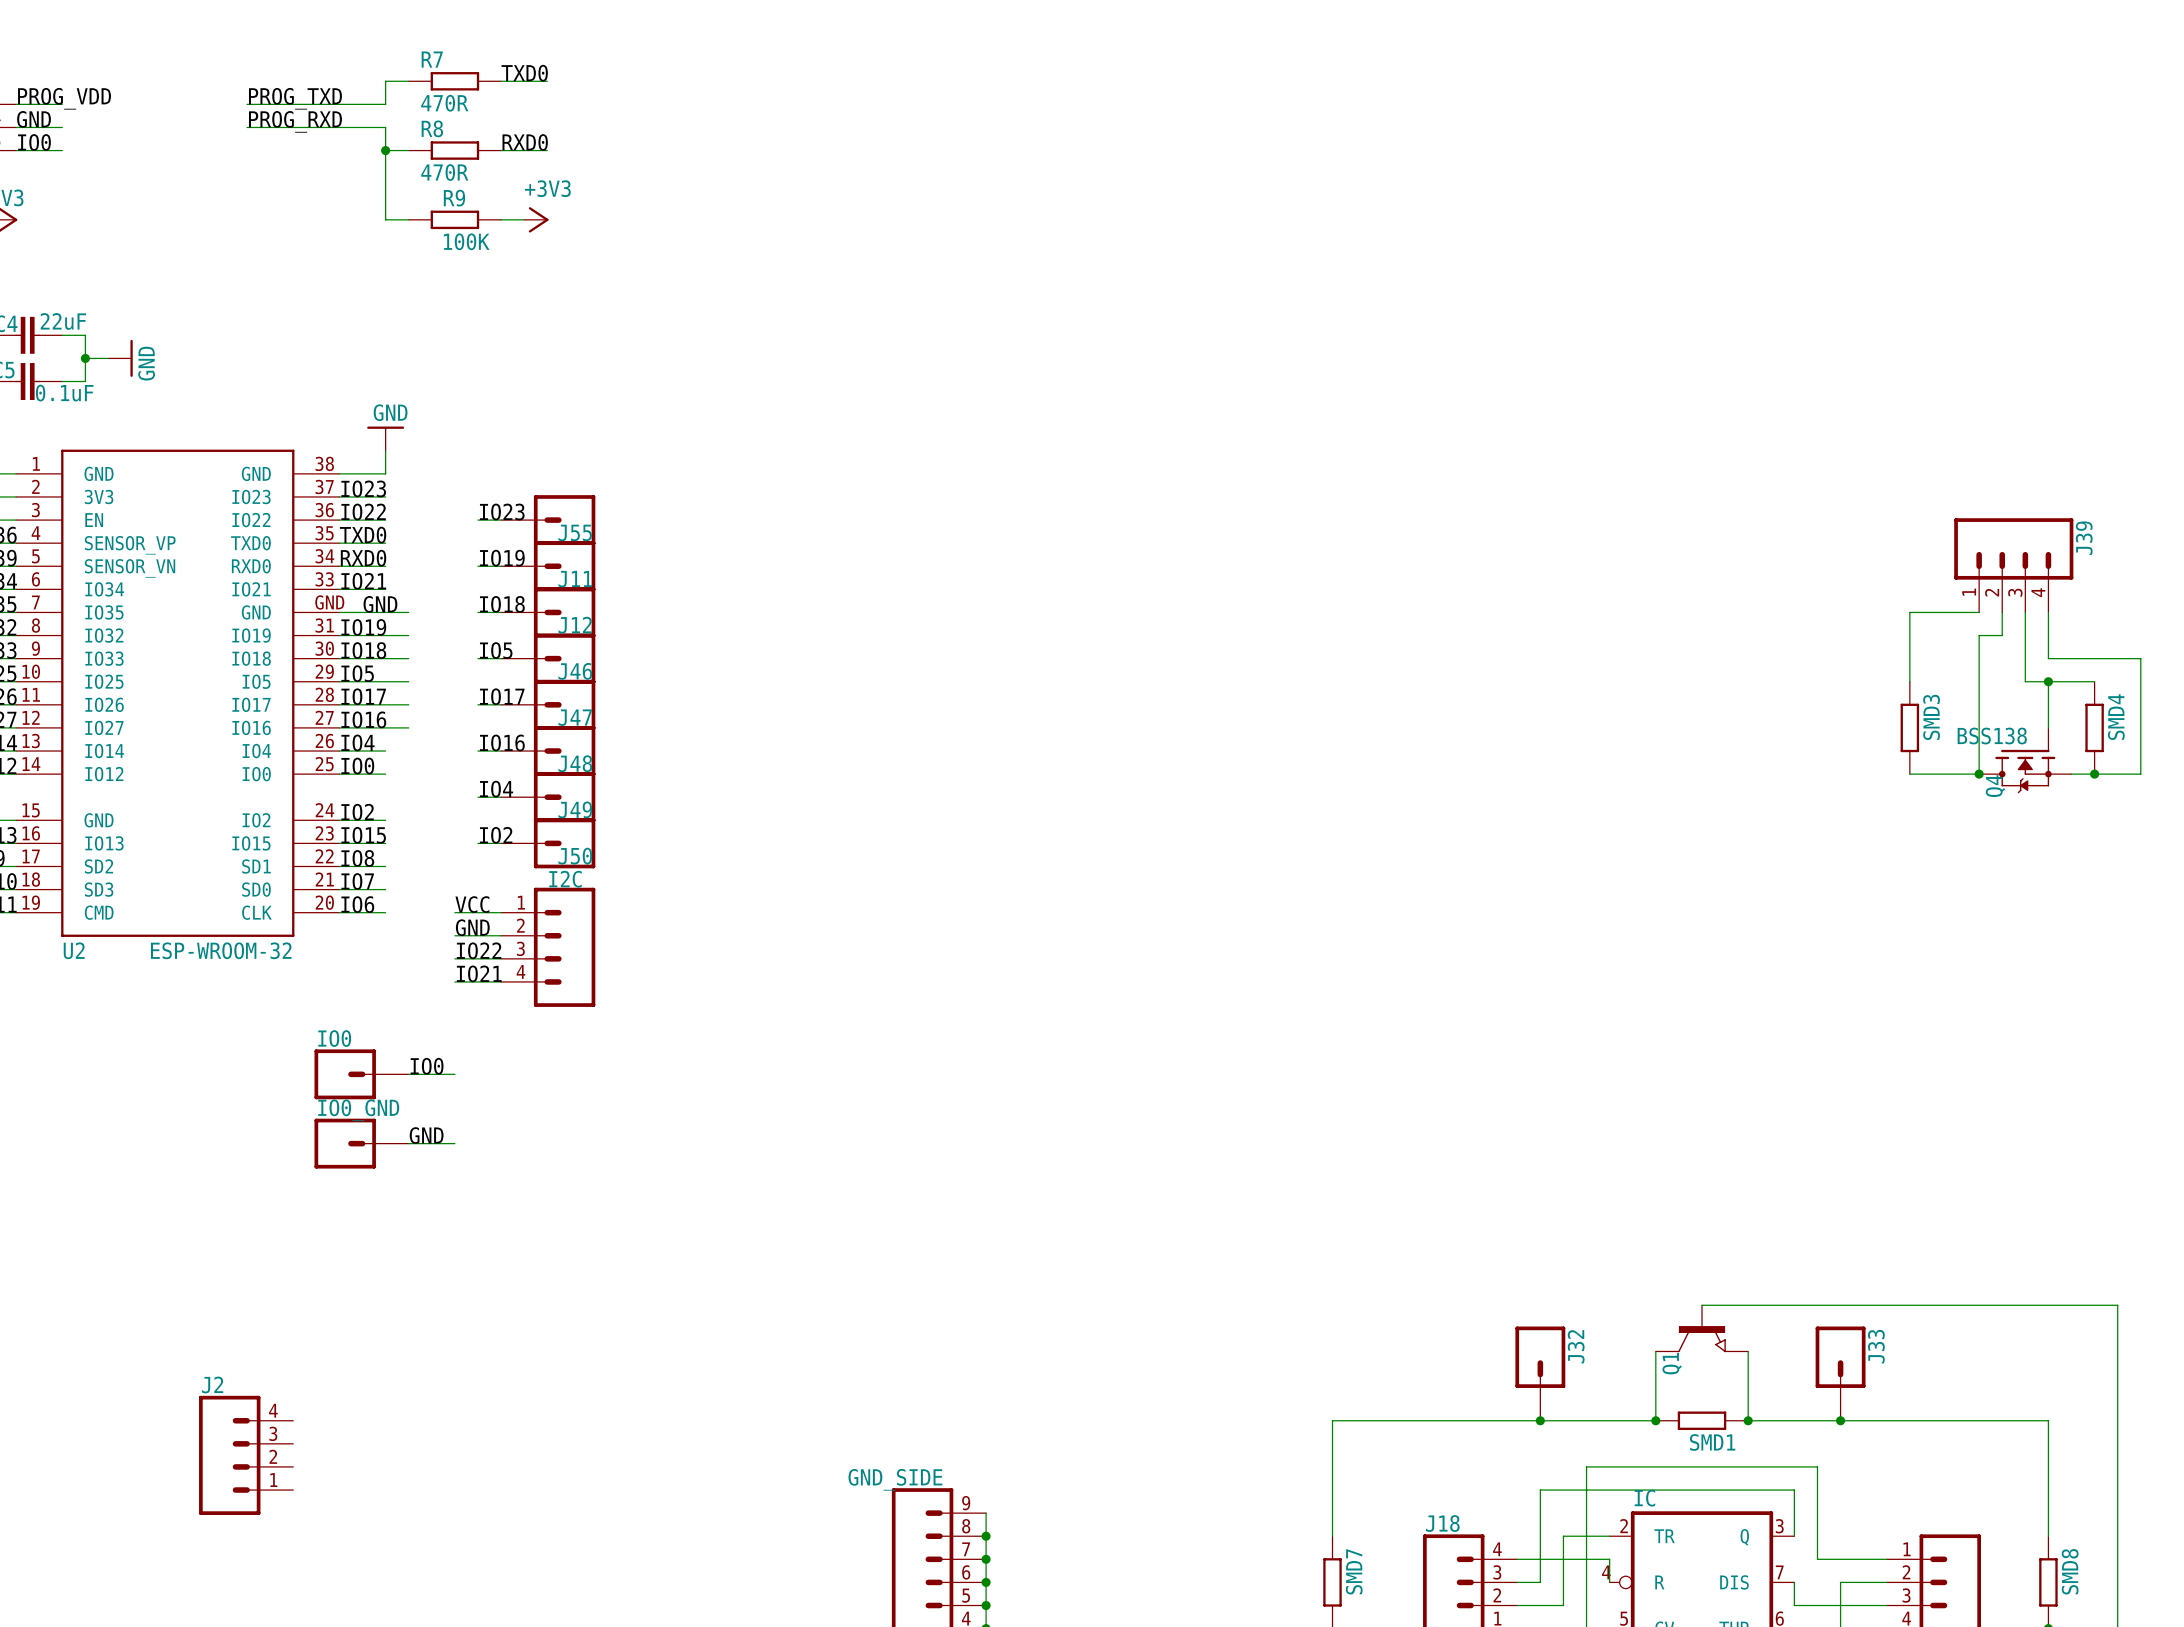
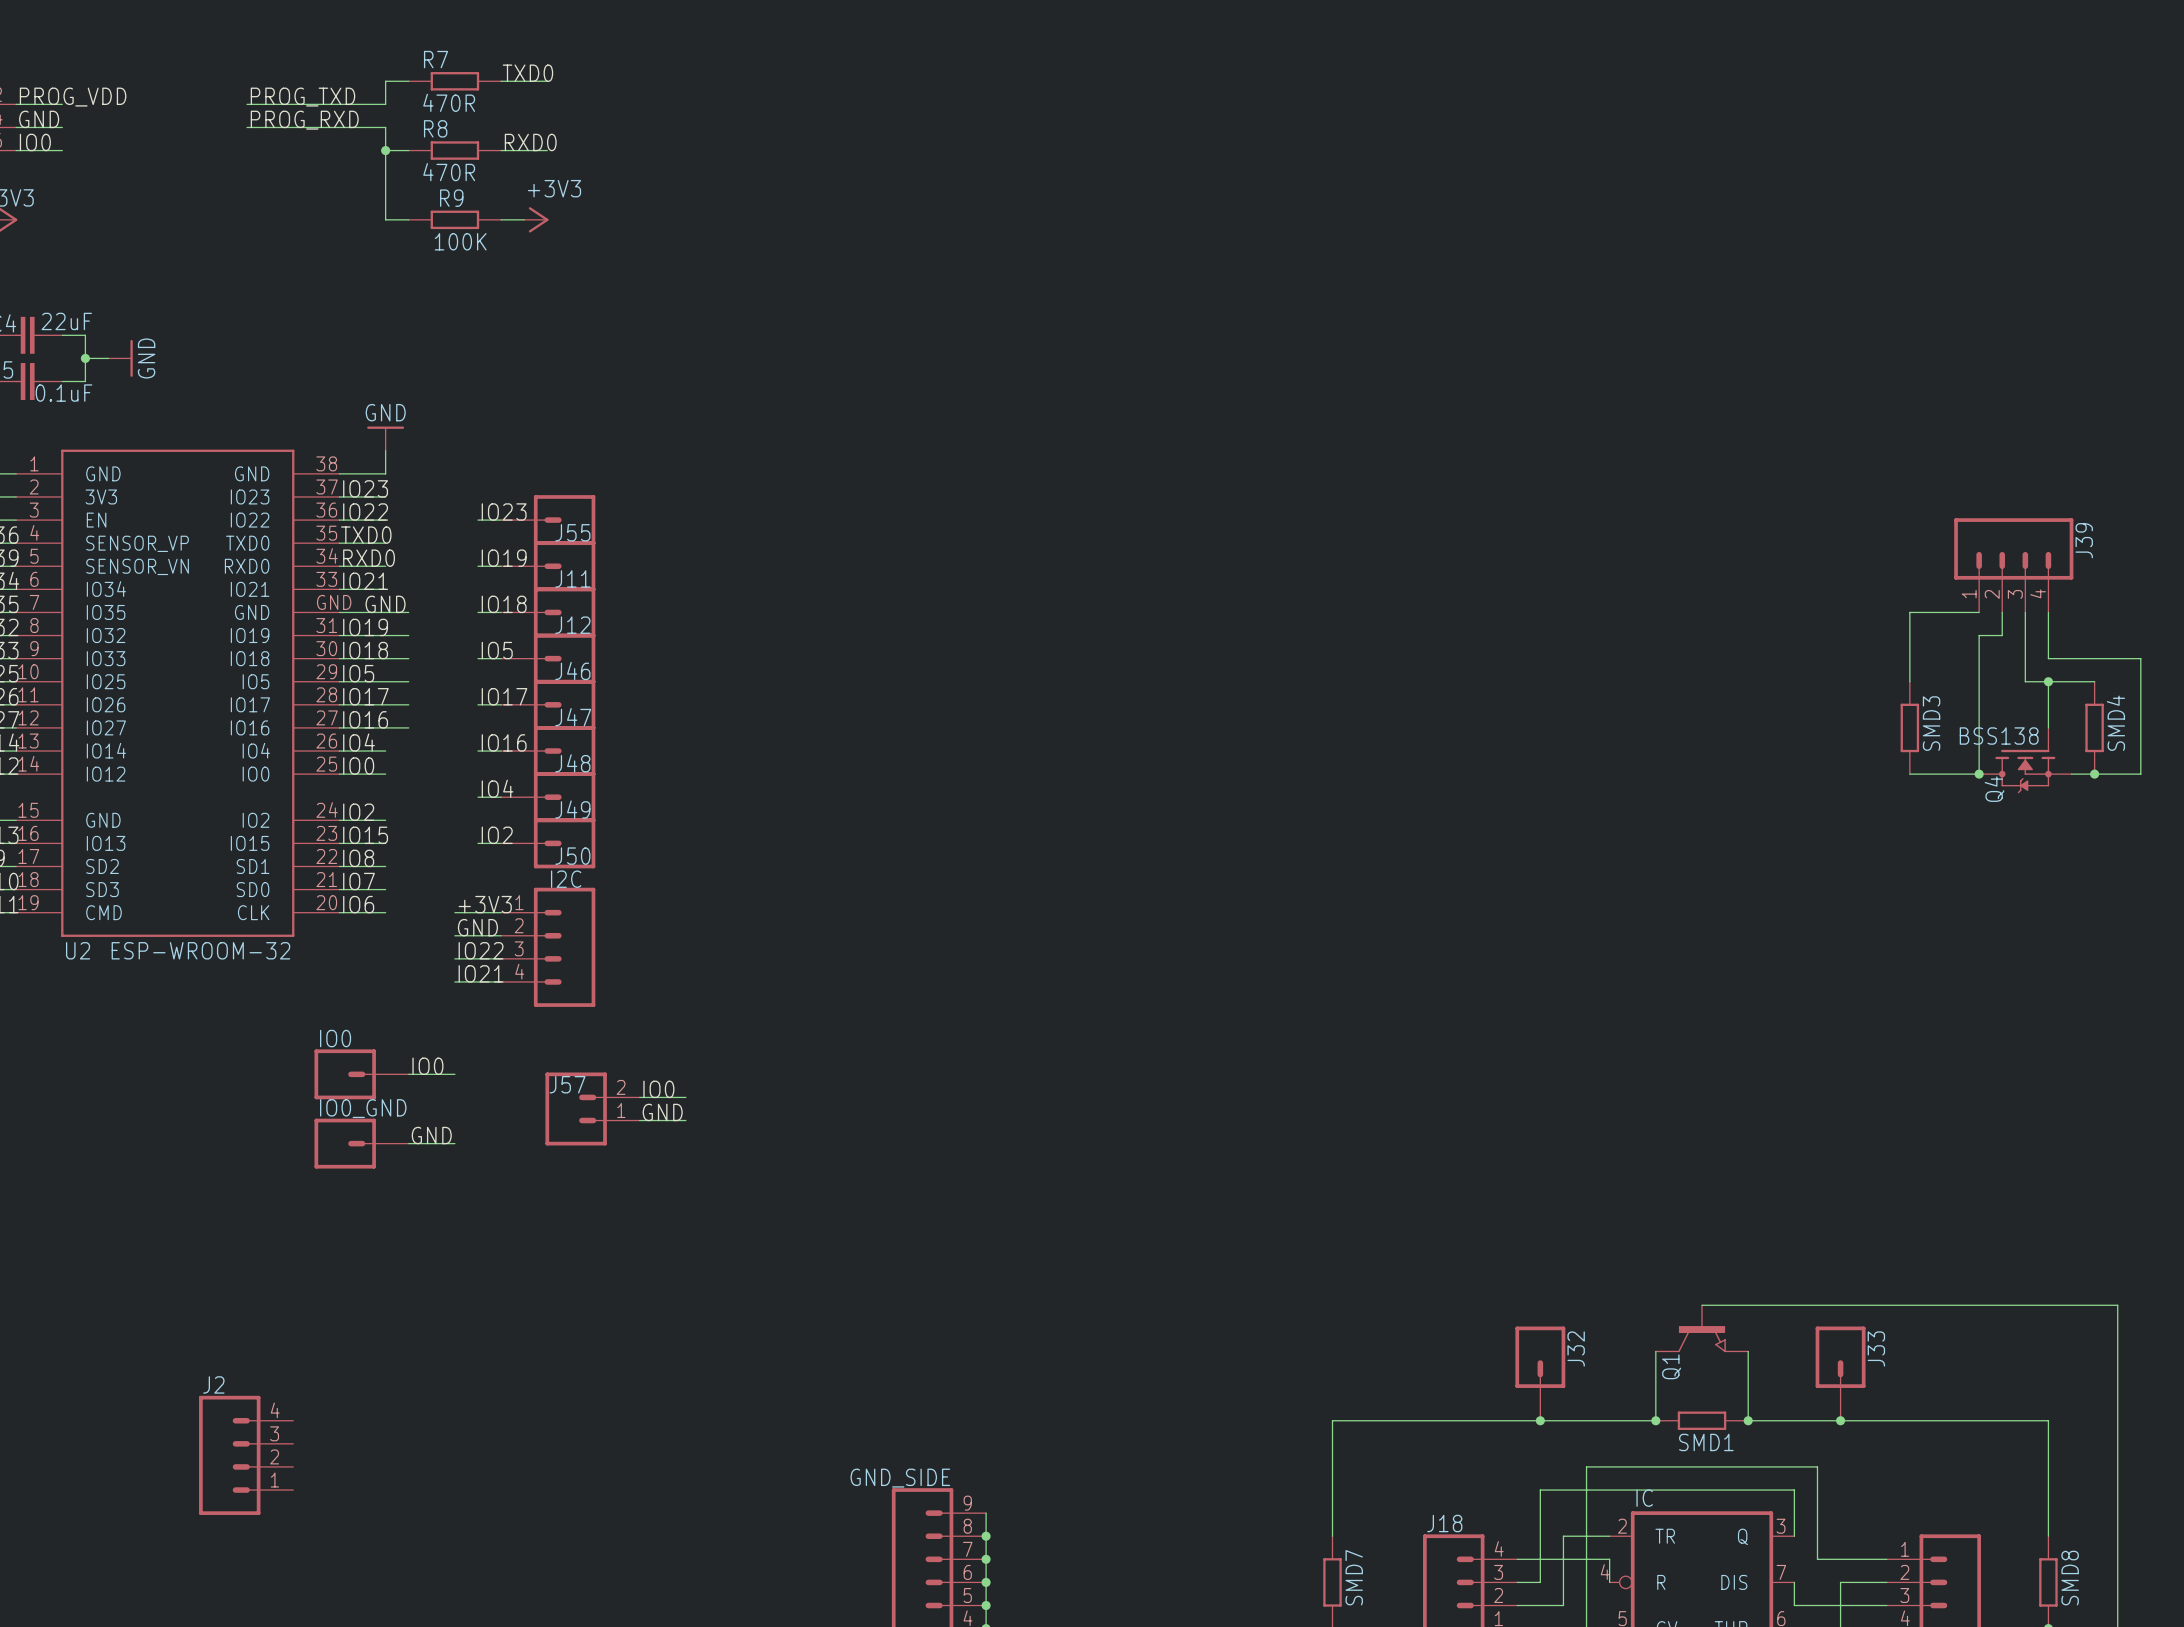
label: VCC (472, 904) -> +3V3 (485, 904)
label: none -> IO0 (658, 1089)
wire: none -> (639, 1097) (685, 1097)
J57: none -> (592, 1108)
label: none -> GND (662, 1112)
wire: none -> (639, 1120) (685, 1120)

